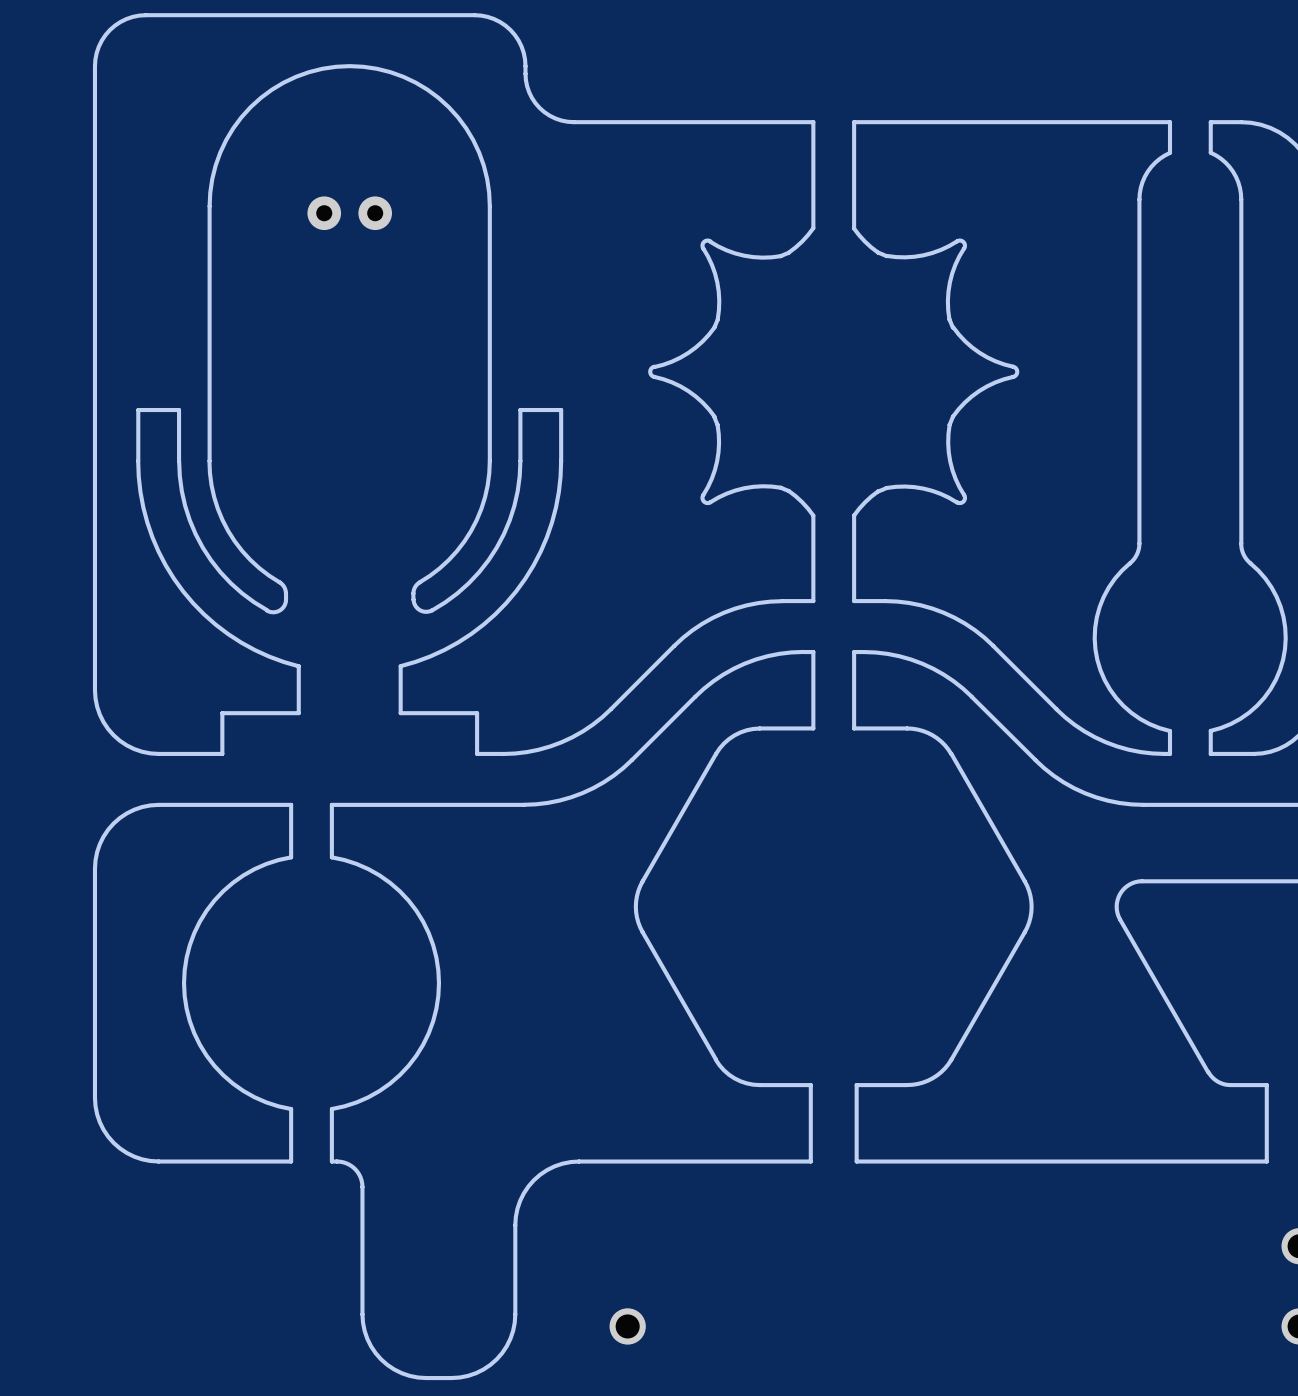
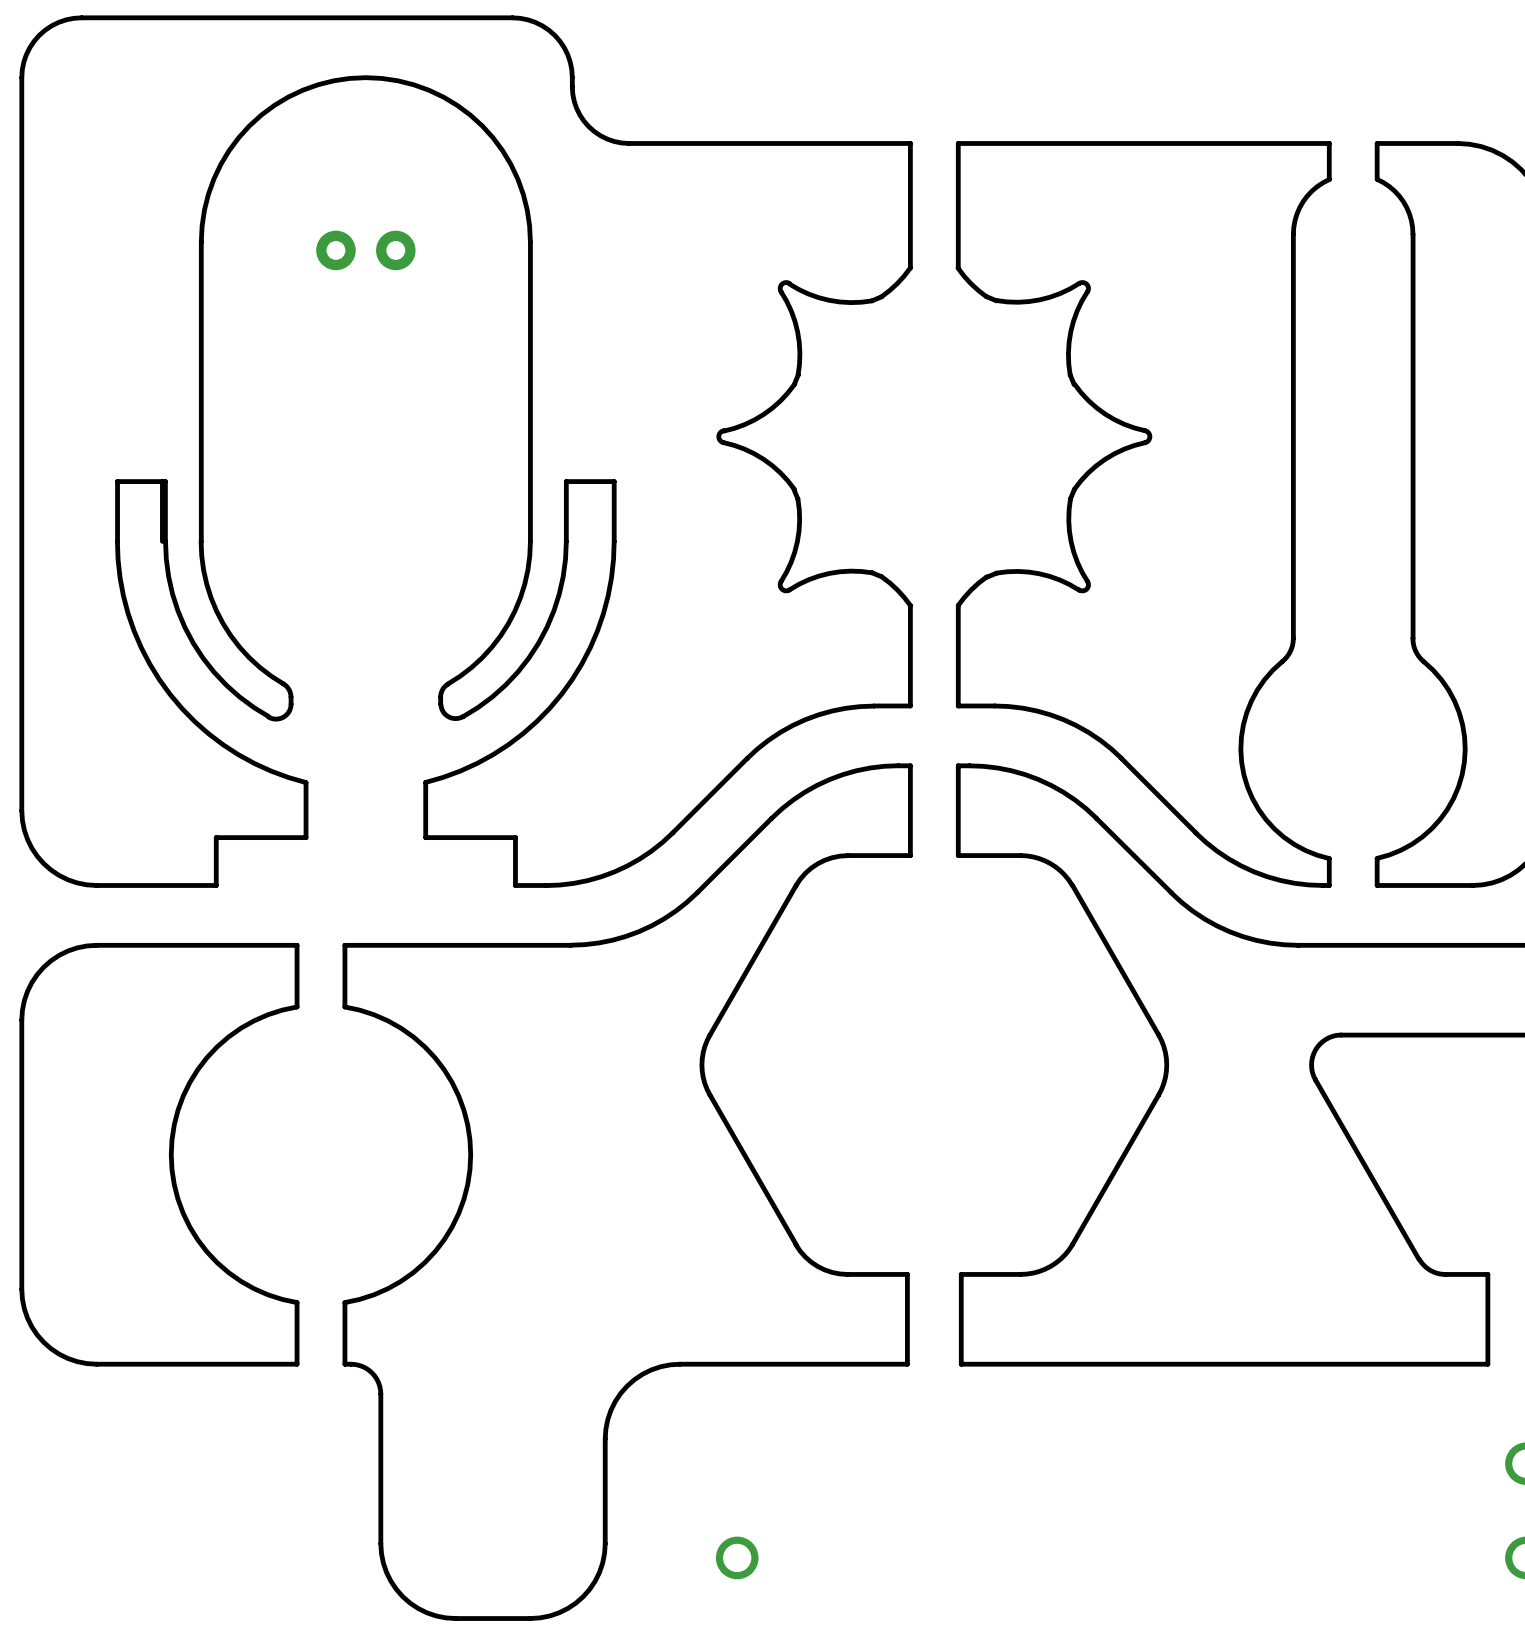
board edge: (145, 15) (126, 19) (109, 30) (98, 46) (95, 59) (94, 690) (99, 714) (113, 735) (134, 749) (158, 753) -> (171, 17) (81, 17) (58, 22) (45, 30) (34, 41) (26, 54) (22, 69) (21, 810) (24, 830) (37, 856) (51, 870) (67, 879) (96, 885) (186, 885)
board edge: (436, 15) (481, 15) (494, 19) (505, 25) (514, 35) (521, 46) (525, 59) (527, 86) (535, 103) (549, 115) (561, 120) (573, 122) -> (512, 17) (535, 22) (548, 30) (559, 41) (570, 62) (572, 94) (576, 108) (584, 121) (594, 131) (607, 139) (621, 142) (674, 143)
board edge: (775, 122) (813, 122) (813, 228) (802, 241) (788, 252) -> (910, 143) (910, 267) (904, 276) (881, 296) (872, 300) (861, 302) (839, 301) (818, 297) (789, 283)
board edge: (854, 122) (854, 228) -> (1003, 143) (958, 143) (958, 267)
board edge: (1131, 122) (1169, 122) (1169, 152) -> (1329, 143) (1329, 179)
board edge: (1210, 122) (1210, 152) (1229, 166) (1238, 182) (1240, 193) (1241, 543) -> (1422, 143) (1377, 143) (1377, 179) (1394, 190) (1403, 201) (1411, 220) (1412, 234)
board edge: none -> (1329, 179) (1317, 186) (1303, 201) (1296, 214) (1293, 227) (1293, 638) (1290, 651) (1282, 661)
board edge: (1170, 152) (1159, 158) (1147, 171) (1139, 193) (1139, 546) (1135, 557) (1114, 578) (1103, 597) (1096, 617) (1094, 638) (1100, 670) (1109, 689) (1131, 712) (1149, 724) (1169, 731) (1169, 753) (1140, 752) (1105, 742) (1074, 724) (1056, 709) -> none
board edge: none -> (1413, 234) (1413, 638)
part position: (349, 213) -> (365, 250)
board edge: (853, 228) (871, 247) (886, 256) -> (958, 268) (978, 290) (996, 300)
board edge: none -> (789, 283) (783, 283) (780, 289) (791, 311) (797, 331) (799, 353) (798, 375)
board edge: (710, 241) (704, 241) (702, 246) (715, 273) (718, 291) (718, 310) (714, 327) (702, 341) (688, 353) (672, 361) (654, 367) -> none
board edge: (710, 241) (726, 250) (753, 257) (771, 257) (788, 252) -> none
board edge: none -> (1087, 291) (1087, 285) (1081, 282) (1060, 293) (1039, 299) (1018, 302) (996, 300)
board edge: none -> (1087, 291) (1073, 321) (1069, 342) (1068, 364) (1074, 384)
board edge: (886, 255) (905, 257) (923, 255) (940, 249) (958, 240) (963, 242) (964, 247) (955, 264) (948, 291) (948, 310) (952, 327) -> none
board edge: none -> (798, 375) (787, 393) (772, 408) (754, 420) (723, 431)
board edge: (953, 327) (965, 341) (979, 352) (995, 361) (1015, 367) (1017, 373) (1013, 376) -> (1074, 384) (1088, 400) (1105, 414) (1124, 424) (1147, 432) (1149, 438) (1144, 442)
board edge: (654, 366) (650, 370) (652, 375) (672, 382) (688, 391) (702, 402) (714, 416) -> (723, 430) (718, 435) (720, 441) (744, 449) (763, 459) (780, 472) (794, 489)
board edge: (1013, 376) (987, 386) (971, 396) (958, 409) (949, 424) -> (1144, 442) (1114, 453) (1096, 465) (1080, 480) (1070, 499)
board edge: (140, 410) (179, 410) (179, 460) -> (165, 481) (166, 559) (172, 594) (184, 627) (203, 658) (226, 685) (239, 696) (268, 716)
board edge: (520, 410) (519, 476) (514, 505) (503, 534) (488, 560) (468, 583) (432, 610) -> (611, 481) (566, 481) (566, 541) (563, 576) (559, 594) (546, 627) (528, 658) (517, 672) (492, 696) (462, 716) (455, 718) (448, 716) (442, 711) (440, 704)
board edge: (522, 410) (561, 410) (558, 492) (546, 537) (525, 578) (506, 603) (483, 624) (444, 650) (400, 666) (400, 713) -> (614, 481) (613, 559) (608, 595) (590, 647) (572, 679) (549, 708) (508, 744) (477, 763) (425, 782)
board edge: (714, 416) (718, 433) (718, 452) (714, 470) (702, 496) (703, 500) (708, 502) (735, 490) (762, 486) (780, 487) (795, 496) (813, 515) (813, 601) (758, 603) (735, 608) (712, 617) (683, 637) (602, 717) (582, 731) (550, 746) (515, 753) (477, 753) (477, 713) (438, 713) -> (793, 489) (799, 509) (799, 531) (794, 552) (780, 582) (781, 587) (787, 590) (818, 576) (850, 571) (872, 572) (889, 582) (910, 605) (910, 705) (845, 708) (818, 714) (792, 725) (757, 749) (662, 842) (639, 859) (601, 876) (560, 885) (515, 885) (515, 837)
board edge: (949, 424) (948, 443) (950, 461) (955, 478) (964, 497) (962, 502) (957, 502) -> (1070, 498) (1068, 520) (1071, 541) (1077, 562) (1088, 584) (1085, 590) (1079, 589)
board edge: (138, 460) (140, 492) (147, 522) (165, 565) (183, 591) (204, 614) (241, 642) (269, 656) (298, 666) (298, 713) (260, 713) -> (162, 481) (117, 481) (118, 559) (123, 595) (134, 630) (159, 679) (194, 721) (238, 754) (271, 771) (306, 782) (306, 837)
board edge: none -> (201, 541) (202, 226) (208, 194) (220, 164) (238, 137) (261, 115) (288, 97) (318, 84) (349, 78) (382, 78) (413, 84) (443, 97) (470, 115) (493, 137) (502, 150) (517, 179) (527, 210) (530, 242) (530, 541) (524, 584) (508, 623) (482, 657) (443, 687) (440, 695) (440, 704)
board edge: none -> (201, 541) (206, 583) (223, 623) (249, 657) (285, 685) (290, 692) (290, 706) (287, 713) (280, 718) (268, 717)
board edge: (179, 460) (185, 505) (202, 547) (230, 583) (267, 610) -> none
board edge: (878, 491) (865, 502) (854, 515) (854, 601) (897, 601) (932, 608) (965, 623) (993, 645) -> (986, 577) (971, 589) (958, 605) (958, 705) (1008, 706) (1050, 714) (1088, 732) (1121, 758)
board edge: (878, 491) (895, 486) (914, 487) (940, 493) (956, 502) -> (986, 577) (1007, 571) (1028, 572) (1059, 580) (1079, 590)
board edge: (1241, 543) (1244, 556) (1265, 578) (1276, 596) (1283, 617) (1285, 649) (1275, 679) (1257, 705) (1230, 723) (1210, 730) -> (1412, 638) (1417, 654) (1441, 679) (1454, 701) (1462, 724) (1464, 762) (1453, 798) (1431, 828) (1400, 850) (1377, 858)
board edge: none -> (1282, 661) (1264, 679) (1246, 712) (1241, 737) (1243, 774) (1258, 809) (1274, 829) (1305, 850) (1329, 858) (1329, 885) (1294, 883) (1254, 871) (1217, 851) (1195, 832)
board edge: (419, 582) (414, 588) (413, 599) -> none
board edge: (419, 582) (448, 560) (464, 541) (476, 520) (487, 485) (489, 460) (489, 206) (487, 178) (479, 152) (466, 128) (448, 107) (427, 89) (403, 76) (377, 68) (335, 66) (309, 72) (283, 82) (250, 107) (226, 140) (215, 165) (210, 192) (209, 460) (211, 485) (222, 520) (234, 541) (259, 568) (282, 584) (285, 593) -> none
board edge: (286, 593) (285, 602) (282, 608) (275, 612) (266, 610) -> none
board edge: (413, 599) (415, 605) (419, 610) (426, 611) (432, 610) -> none
board edge: (993, 645) (1056, 709) -> (1121, 758) (1195, 832)
board edge: none -> (425, 782) (425, 837) (470, 837)
board edge: (971, 696) (953, 681) (922, 663) (887, 653) (854, 652) (854, 728) -> (1096, 818) (1075, 800) (1038, 779) (997, 768) (958, 765) (958, 855) (1003, 855)
board edge: (971, 696) (1035, 760) -> (1096, 818) (1171, 892)
board edge: (222, 713) (222, 753) (184, 753) -> (261, 837) (216, 837) (216, 885)
board edge: (759, 728) (746, 730) (734, 735) (719, 748) (642, 881) (636, 901) (636, 917) (640, 927) (716, 1059) -> (892, 855) (839, 856) (817, 863) (805, 873) (796, 885) (709, 1035) (703, 1052) (702, 1071) (707, 1089) (796, 1244)
board edge: (775, 728) (813, 728) (813, 652) (791, 652) (767, 656) (744, 663) (723, 674) (695, 696) (623, 768) (593, 788) (571, 797) (547, 802) (485, 804) -> (910, 855) (910, 765) (884, 766) (856, 770) (816, 785) (792, 800) (771, 818) (687, 902) (664, 918) (625, 936) (598, 943) (570, 945)
board edge: (868, 728) (907, 728) (922, 730) (941, 741) (951, 754) -> (1020, 855) (1032, 856) (1050, 863) (1065, 875) (1072, 885)
board edge: (1210, 731) (1210, 753) -> (1377, 858) (1377, 885) (1422, 885)
board edge: (951, 753) (1027, 886) (1031, 901) (1030, 917) (1024, 932) (945, 1068) (932, 1078) (917, 1083) (868, 1085) -> (1072, 885) (1161, 1040) (1165, 1052) (1166, 1071) (1158, 1094) (1069, 1249) (1060, 1259) (1044, 1269) (1020, 1274)
board edge: (1035, 760) (1053, 775) (1085, 793) (1107, 800) (1143, 804) -> (1171, 892) (1204, 918) (1242, 936) (1284, 944) (1343, 945)
board edge: (158, 804) (134, 809) (113, 823) (99, 844) (94, 868) (94, 1097) (97, 1114) (108, 1136) (119, 1148) (142, 1159) (158, 1161) -> (186, 945) (96, 945) (67, 951) (51, 960) (37, 974) (24, 1000) (21, 1020) (21, 1289) (27, 1318) (43, 1342) (59, 1354) (77, 1361) (96, 1364) (186, 1364)
board edge: (252, 804) (291, 804) (291, 857) (266, 863) (243, 875) (214, 900) (194, 933) (186, 957) (184, 983) (186, 1008) (194, 1033) (214, 1065) (243, 1090) (266, 1102) (291, 1109) (291, 1161) (252, 1161) -> (297, 945) (297, 1006) (267, 1014) (241, 1028) (228, 1036) (206, 1057) (197, 1069) (183, 1096) (174, 1124) (171, 1154) (174, 1184) (183, 1213) (197, 1239) (206, 1251) (228, 1272) (241, 1281) (267, 1294) (297, 1302) (297, 1364)
board edge: (331, 804) (331, 857) (368, 869) (399, 891) (423, 921) (436, 957) (438, 983) (436, 1008) (428, 1033) (416, 1055) (399, 1075) (379, 1090) (356, 1102) (331, 1109) (331, 1161) (343, 1162) (352, 1166) (359, 1174) (362, 1183) (362, 1314) (367, 1338) (375, 1353) (387, 1364) (409, 1375) (426, 1378) -> (389, 945) (344, 945) (344, 1006) (374, 1014) (400, 1028) (413, 1036) (435, 1057) (452, 1082) (463, 1110) (469, 1139) (469, 1169) (467, 1184) (458, 1213) (444, 1239) (424, 1262) (413, 1272) (387, 1288) (374, 1294) (344, 1302) (344, 1364) (354, 1364) (365, 1368) (374, 1375) (379, 1386) (380, 1543) (383, 1563) (390, 1581) (402, 1596) (427, 1612) (445, 1617) (500, 1618)
board edge: (715, 1059) (723, 1070) (734, 1078) (746, 1083) (759, 1085) -> (795, 1244) (811, 1262) (832, 1272) (847, 1274) (892, 1274)
board edge: (772, 1085) (810, 1085) (810, 1161) (772, 1161) -> (907, 1274) (907, 1364)
board edge: (856, 1085) (856, 1161) -> (1006, 1274) (961, 1274) (961, 1364) (1006, 1364)

